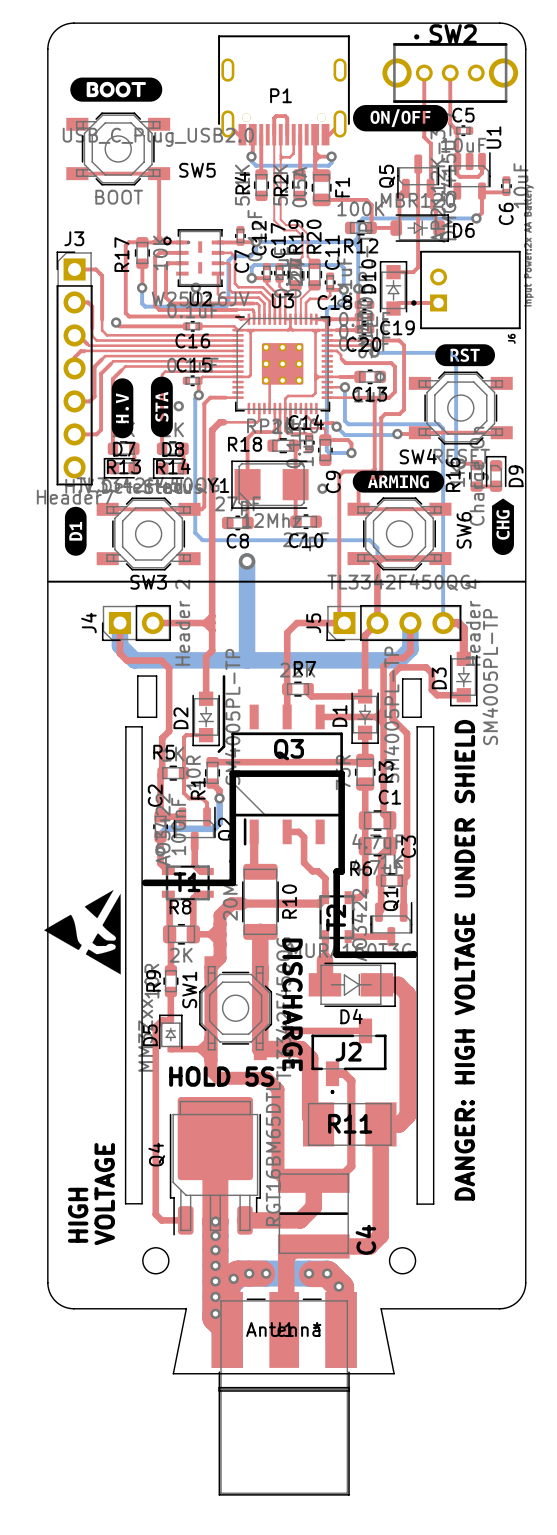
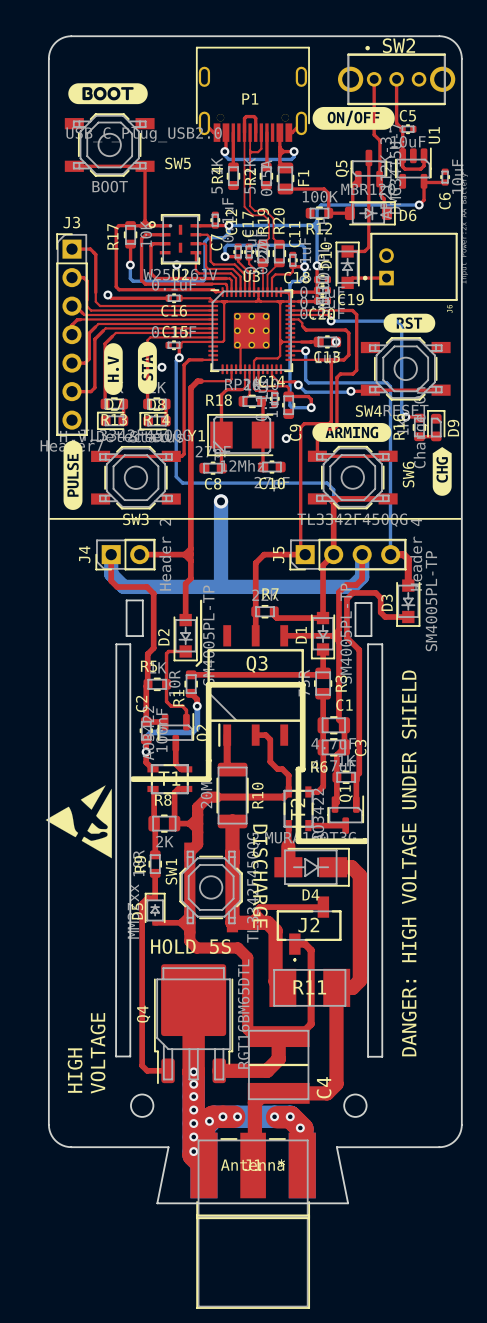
drawing shape: [64, 506, 87, 556] -> [63, 440, 83, 510]

